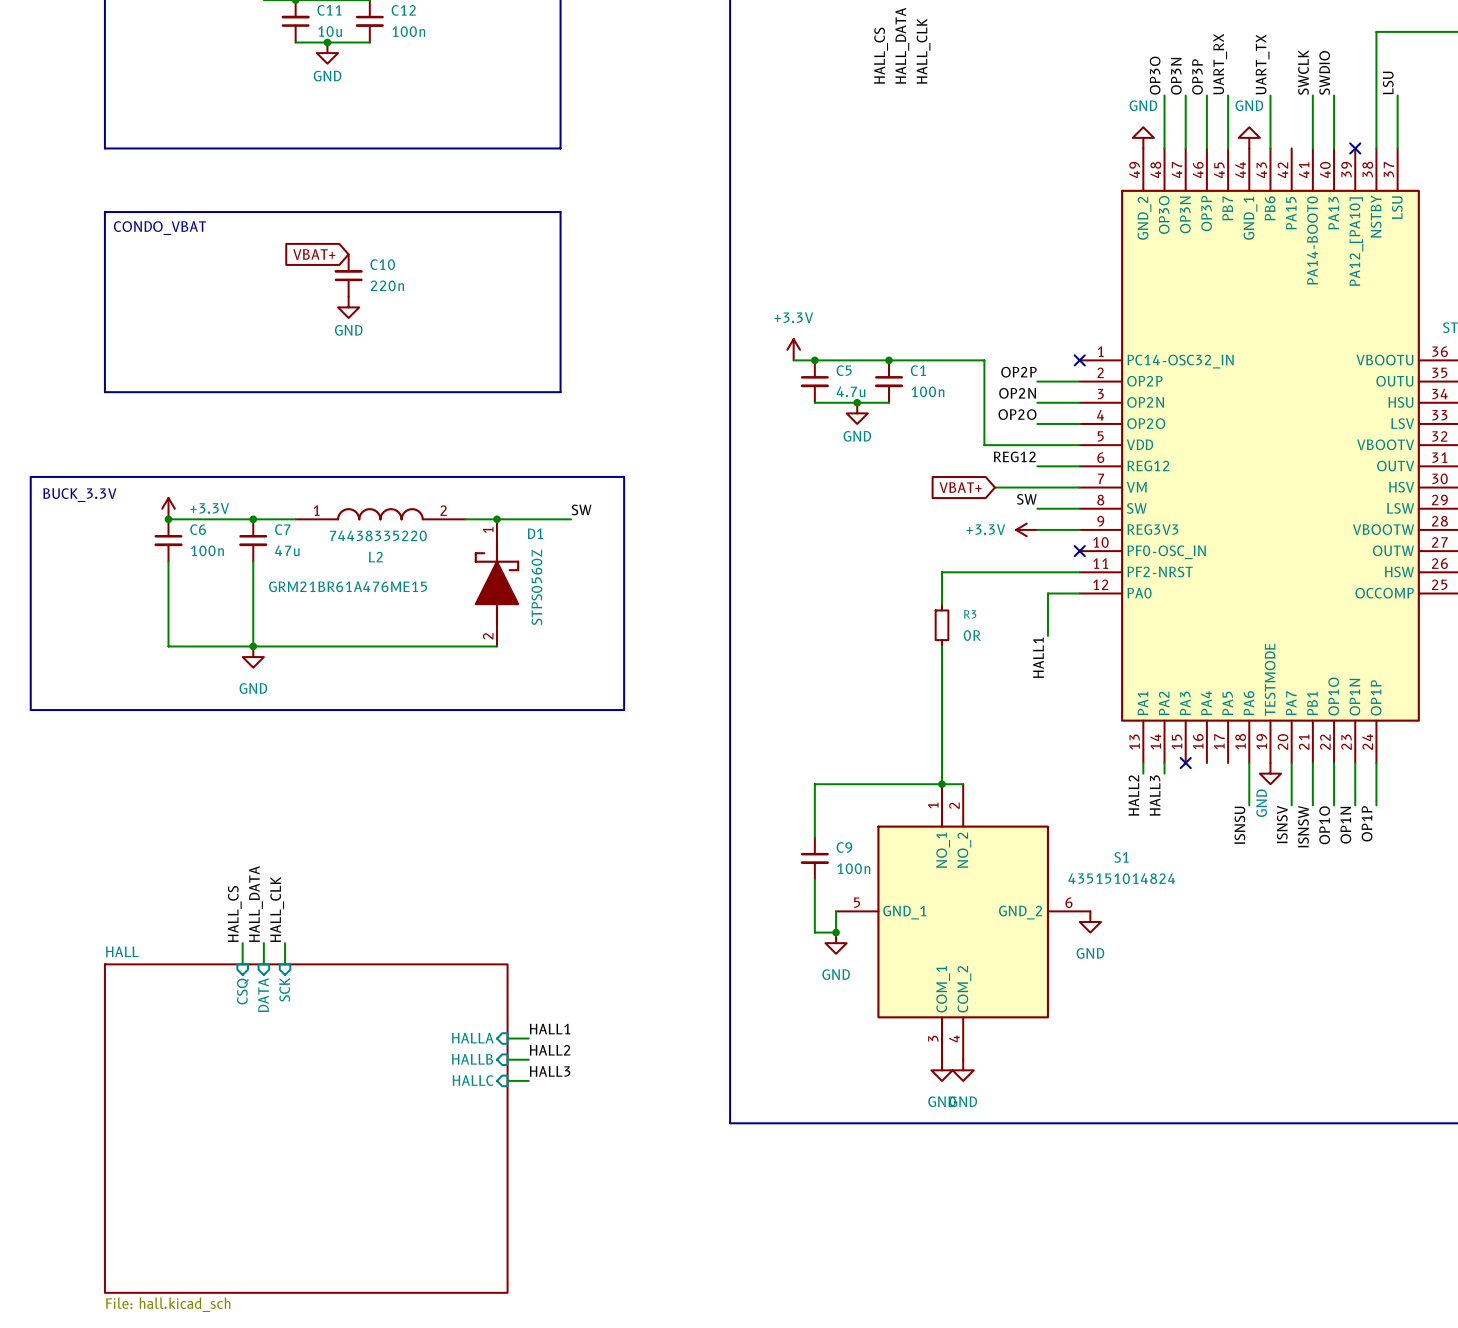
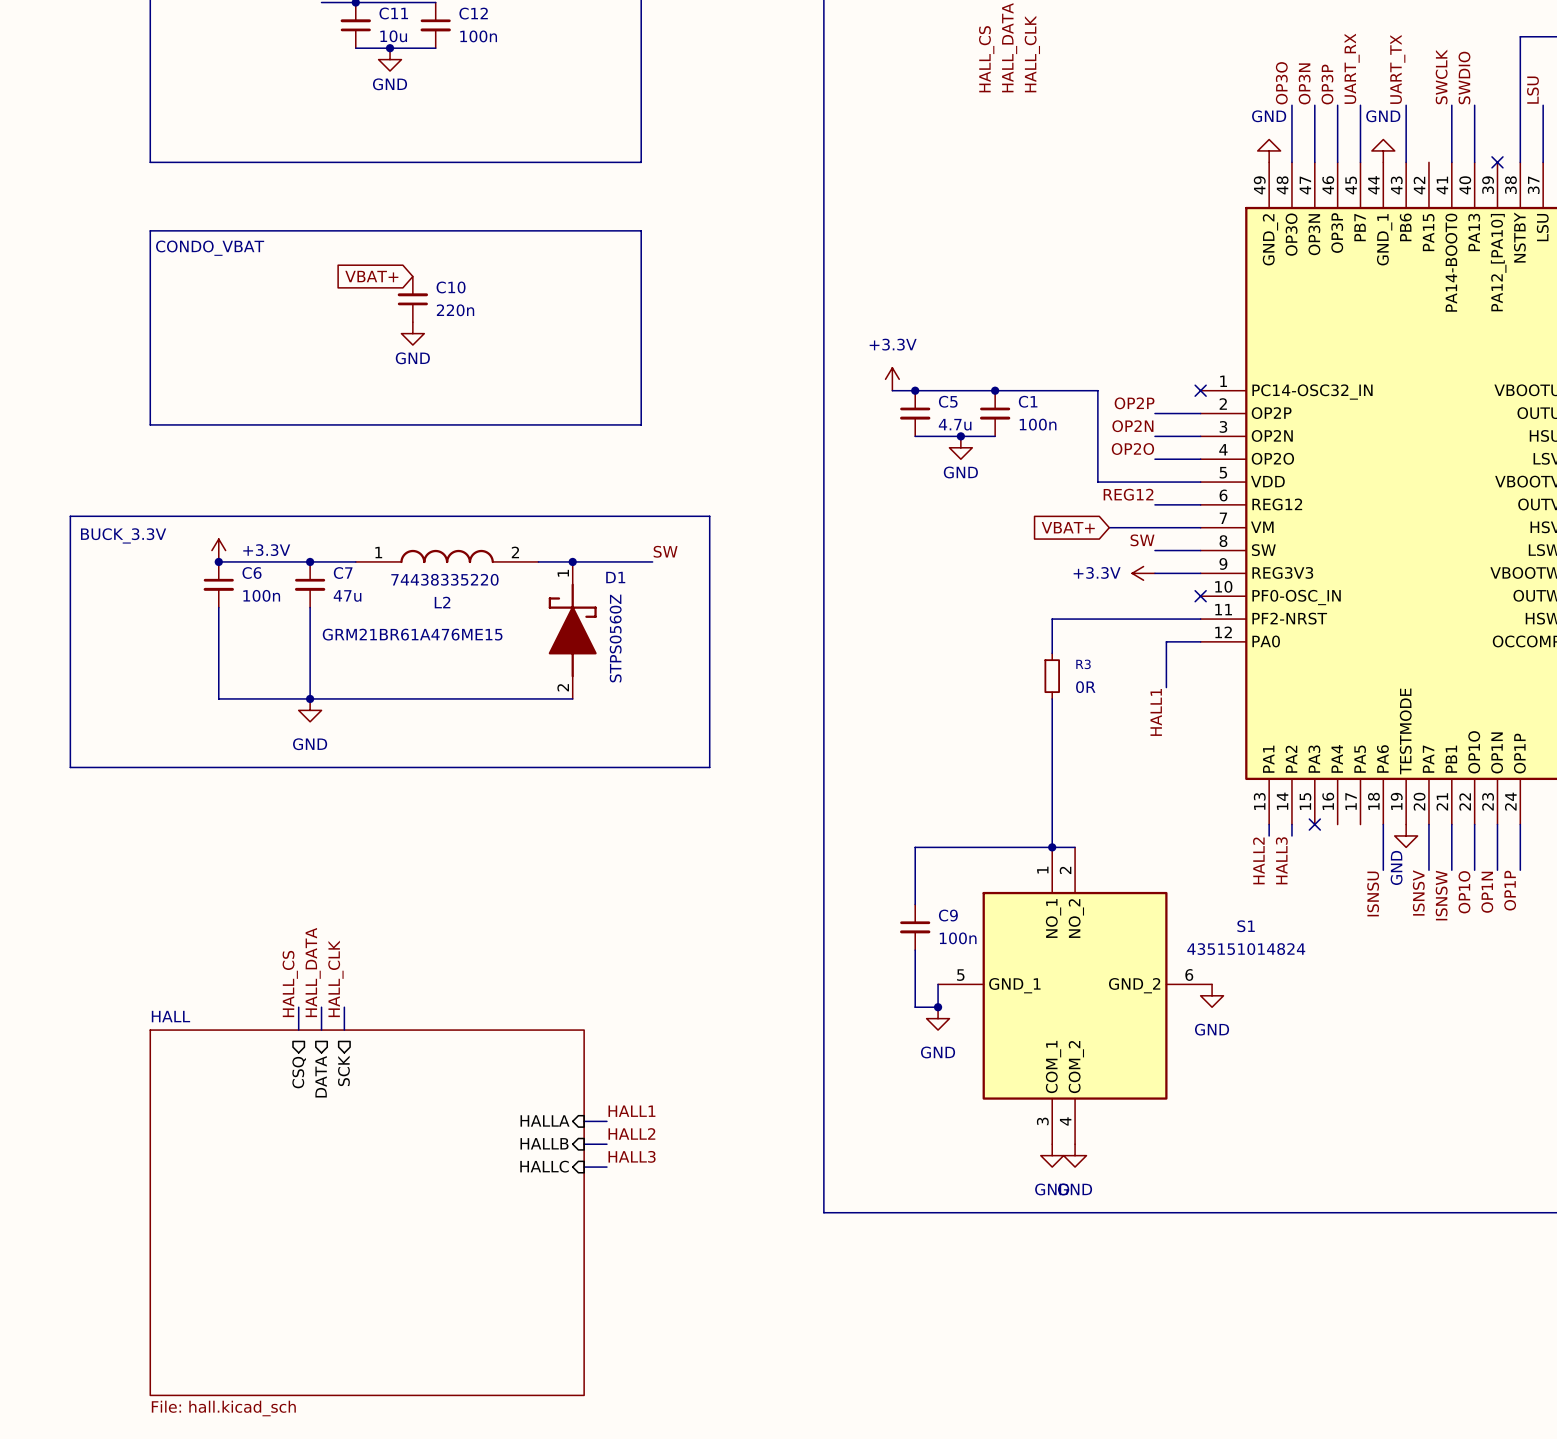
wire: (242, 953) (242, 964) -> (298, 1007) (298, 1018)
wire: (263, 953) (263, 964) -> (321, 1007) (321, 1018)
wire: (285, 953) (285, 964) -> (344, 1007) (344, 1018)
sheet HALL shape: [104, 963, 509, 1294] -> [149, 1029, 585, 1397]

